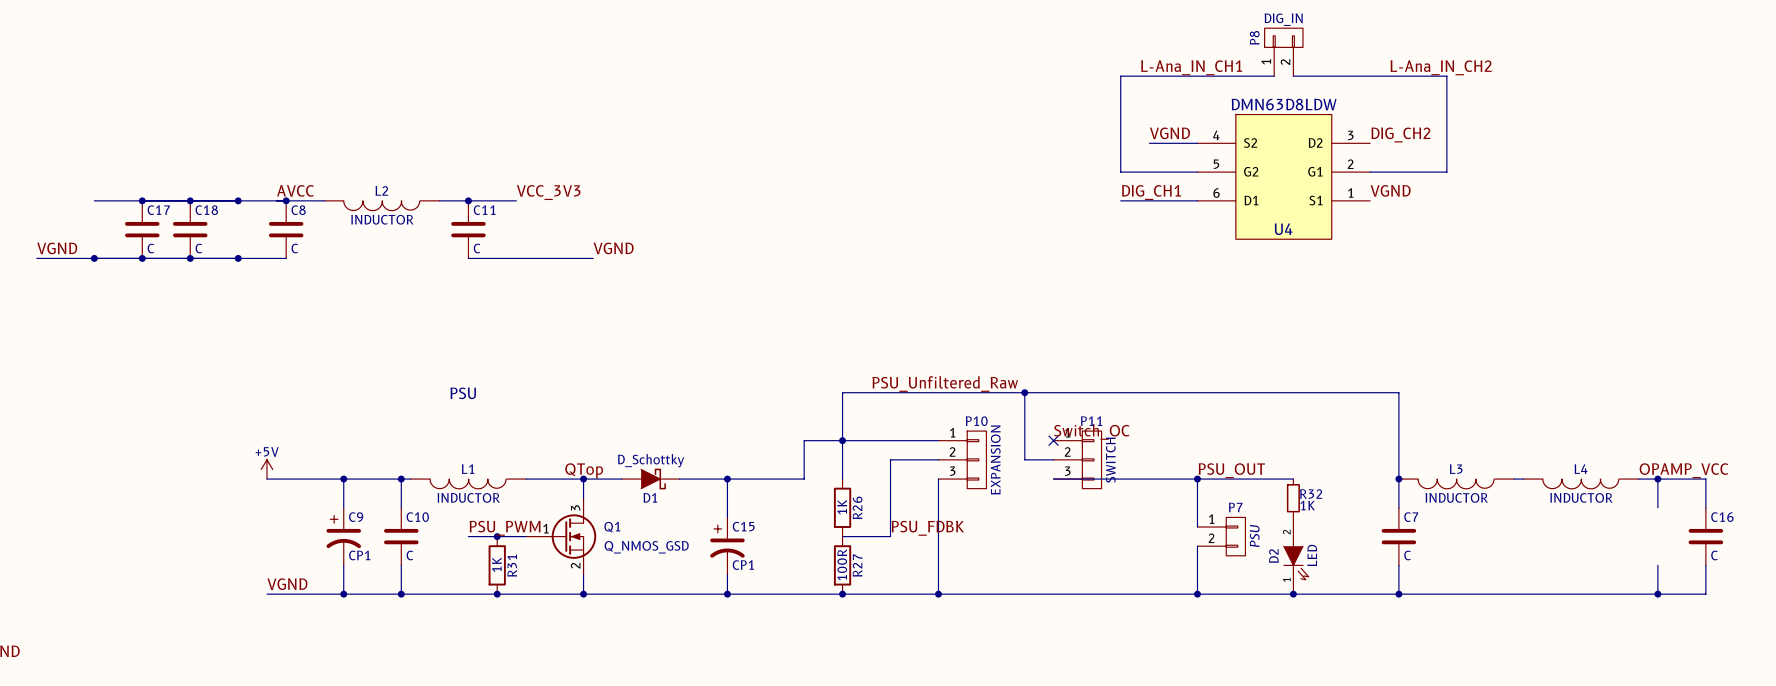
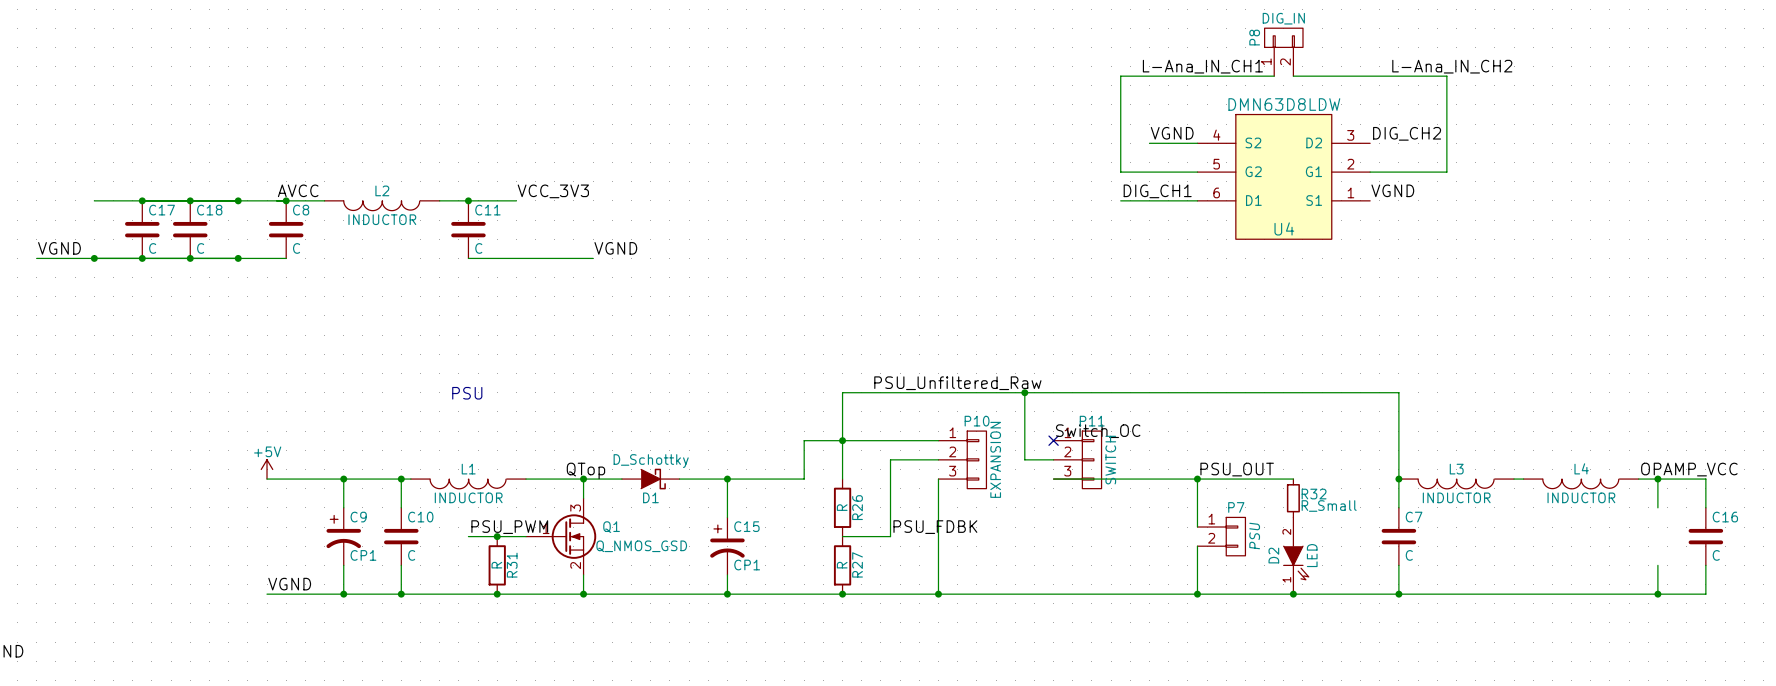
R32 value: 1K (1307, 505) -> R_Small (1329, 506)
R26 value: 1K (842, 507) -> R (842, 507)
R31 value: 1K (496, 564) -> R (496, 565)
R27 value: 100R (842, 564) -> R (842, 565)

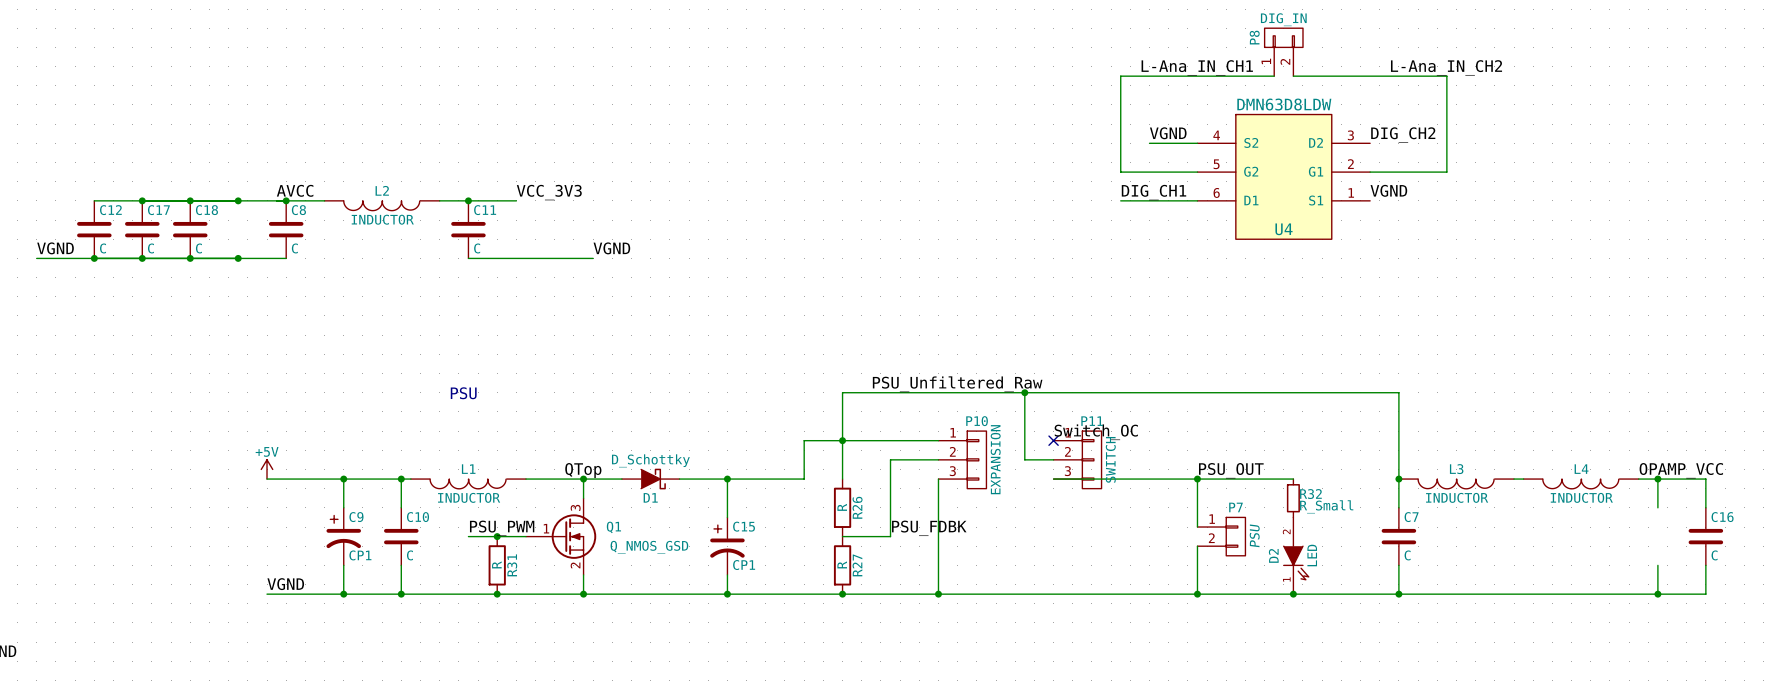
C12: none -> C (94, 229)

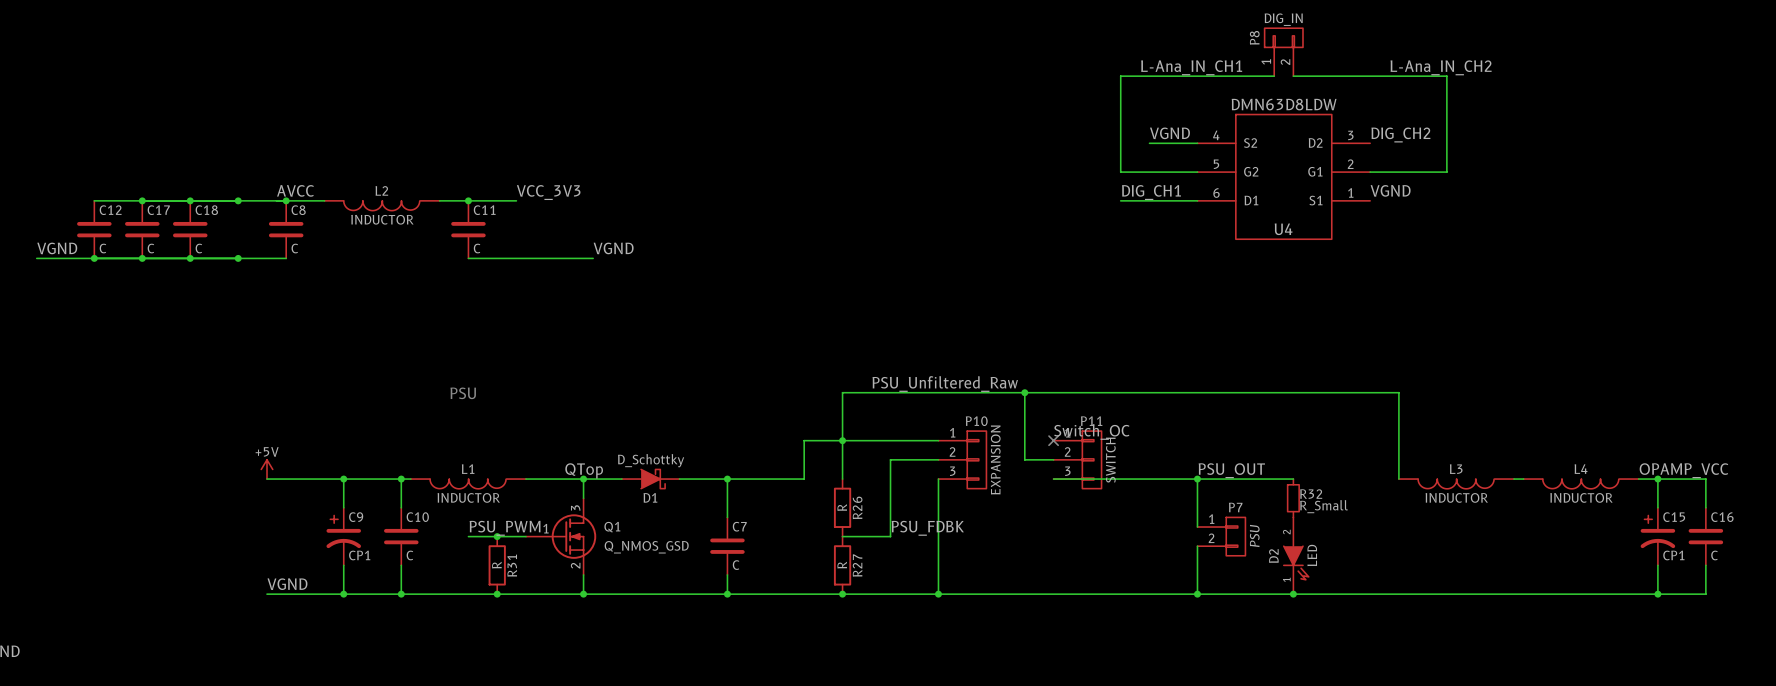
wire: (1398, 479) (1398, 507) -> none
junction: (1398, 479) -> none
C7 position: (1398, 536) -> (727, 546)
C15 position: (727, 546) -> (1657, 536)
wire: (1398, 565) (1398, 594) -> none
junction: (1398, 594) -> none

